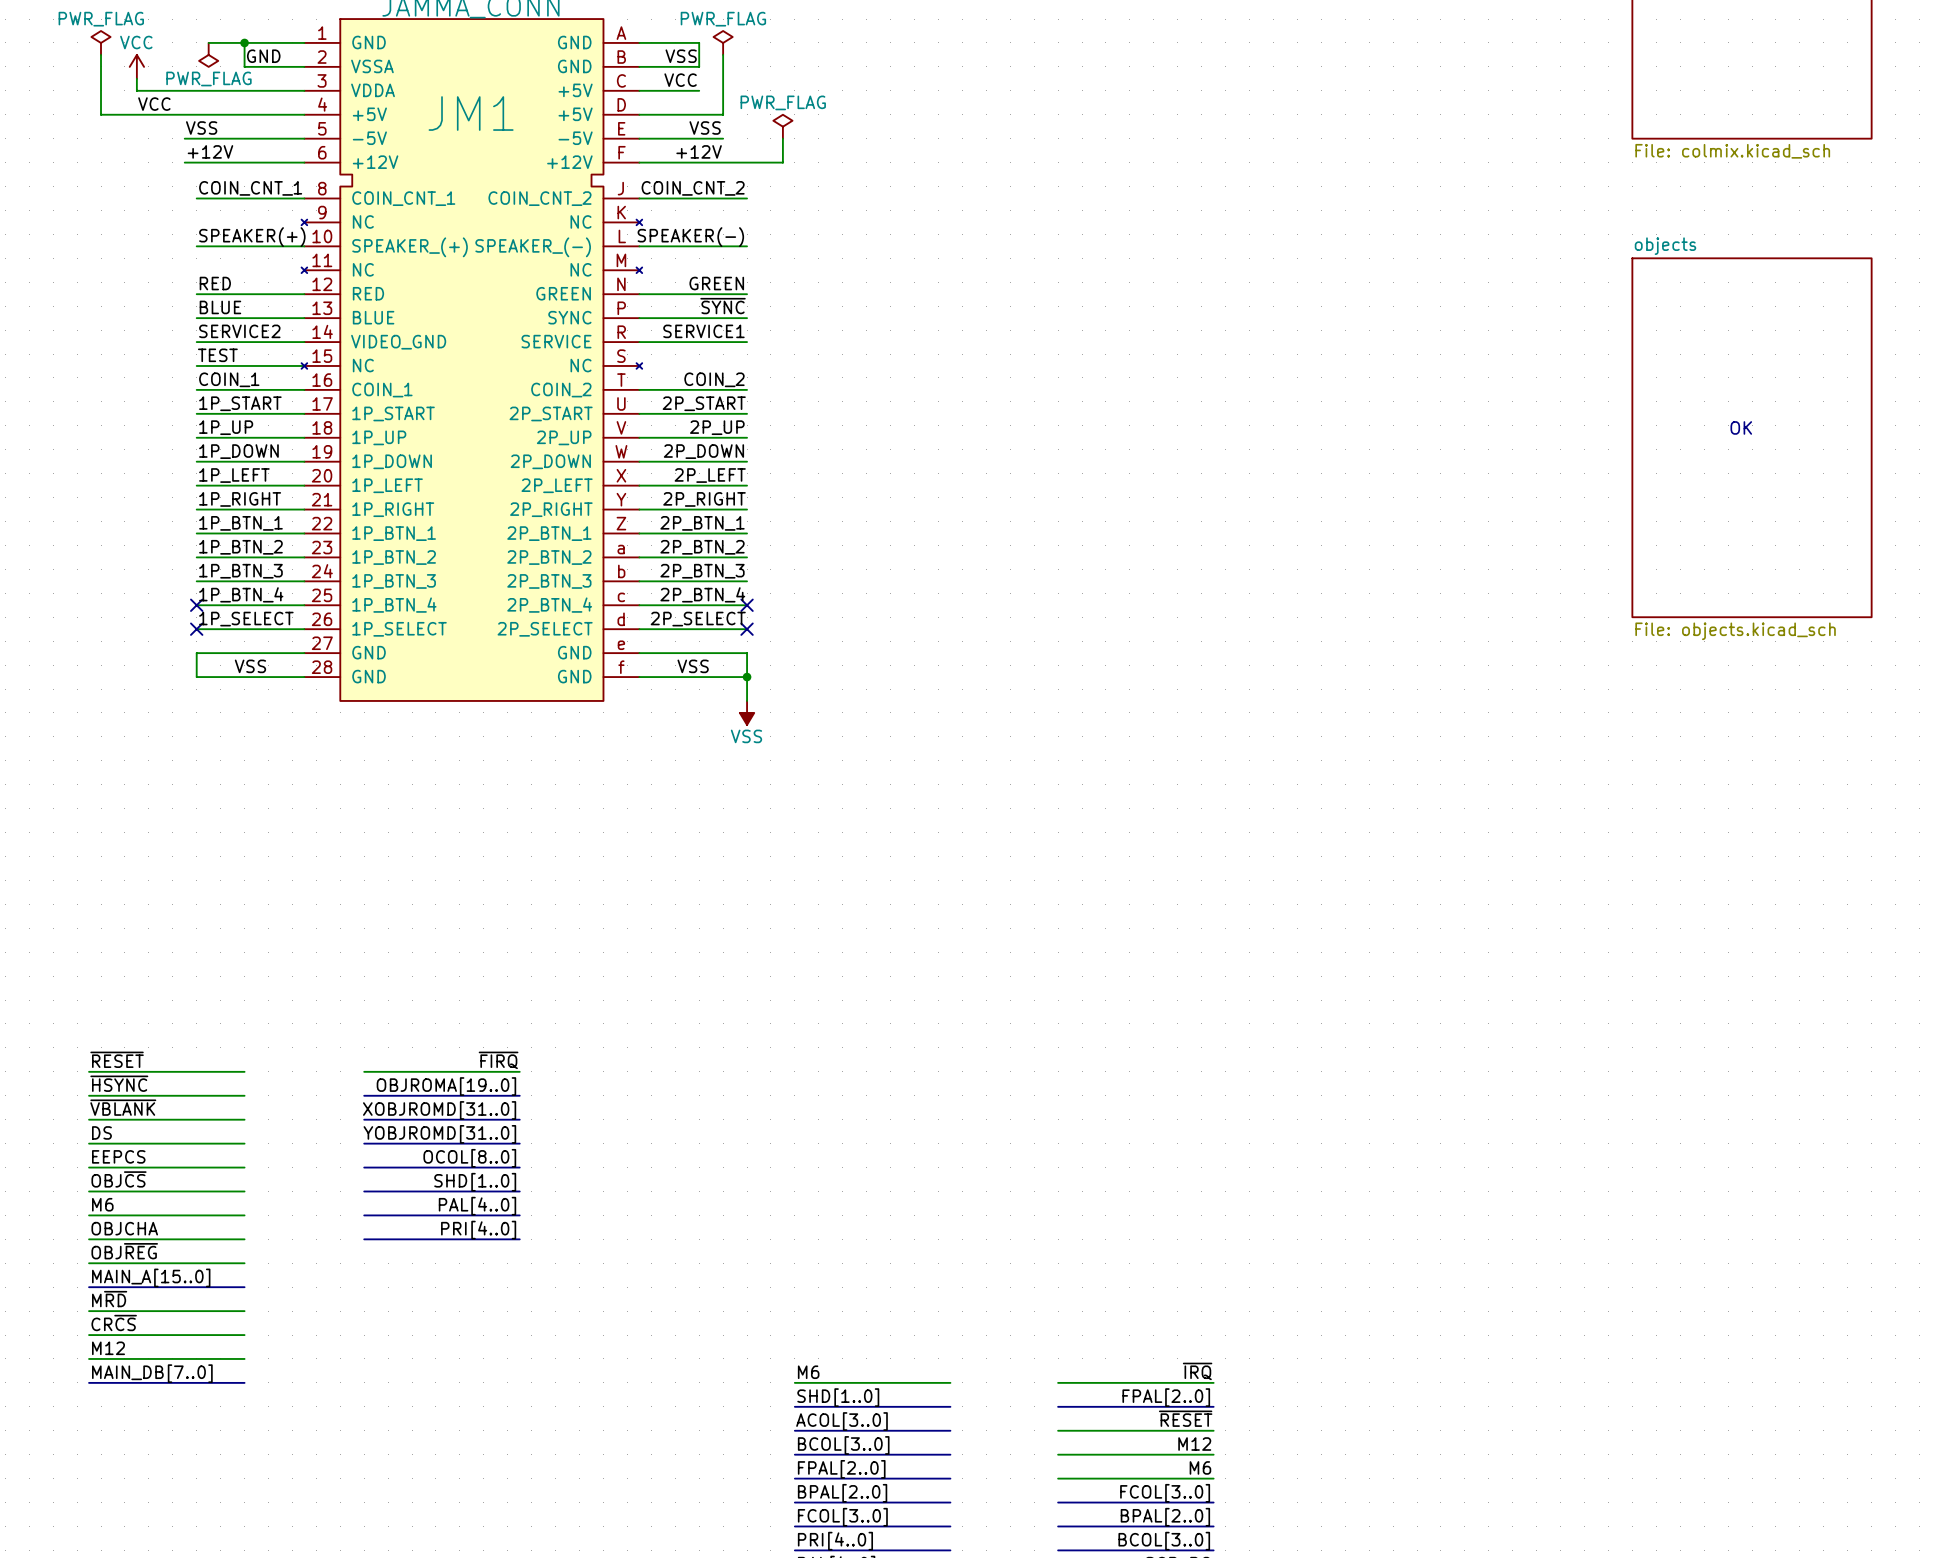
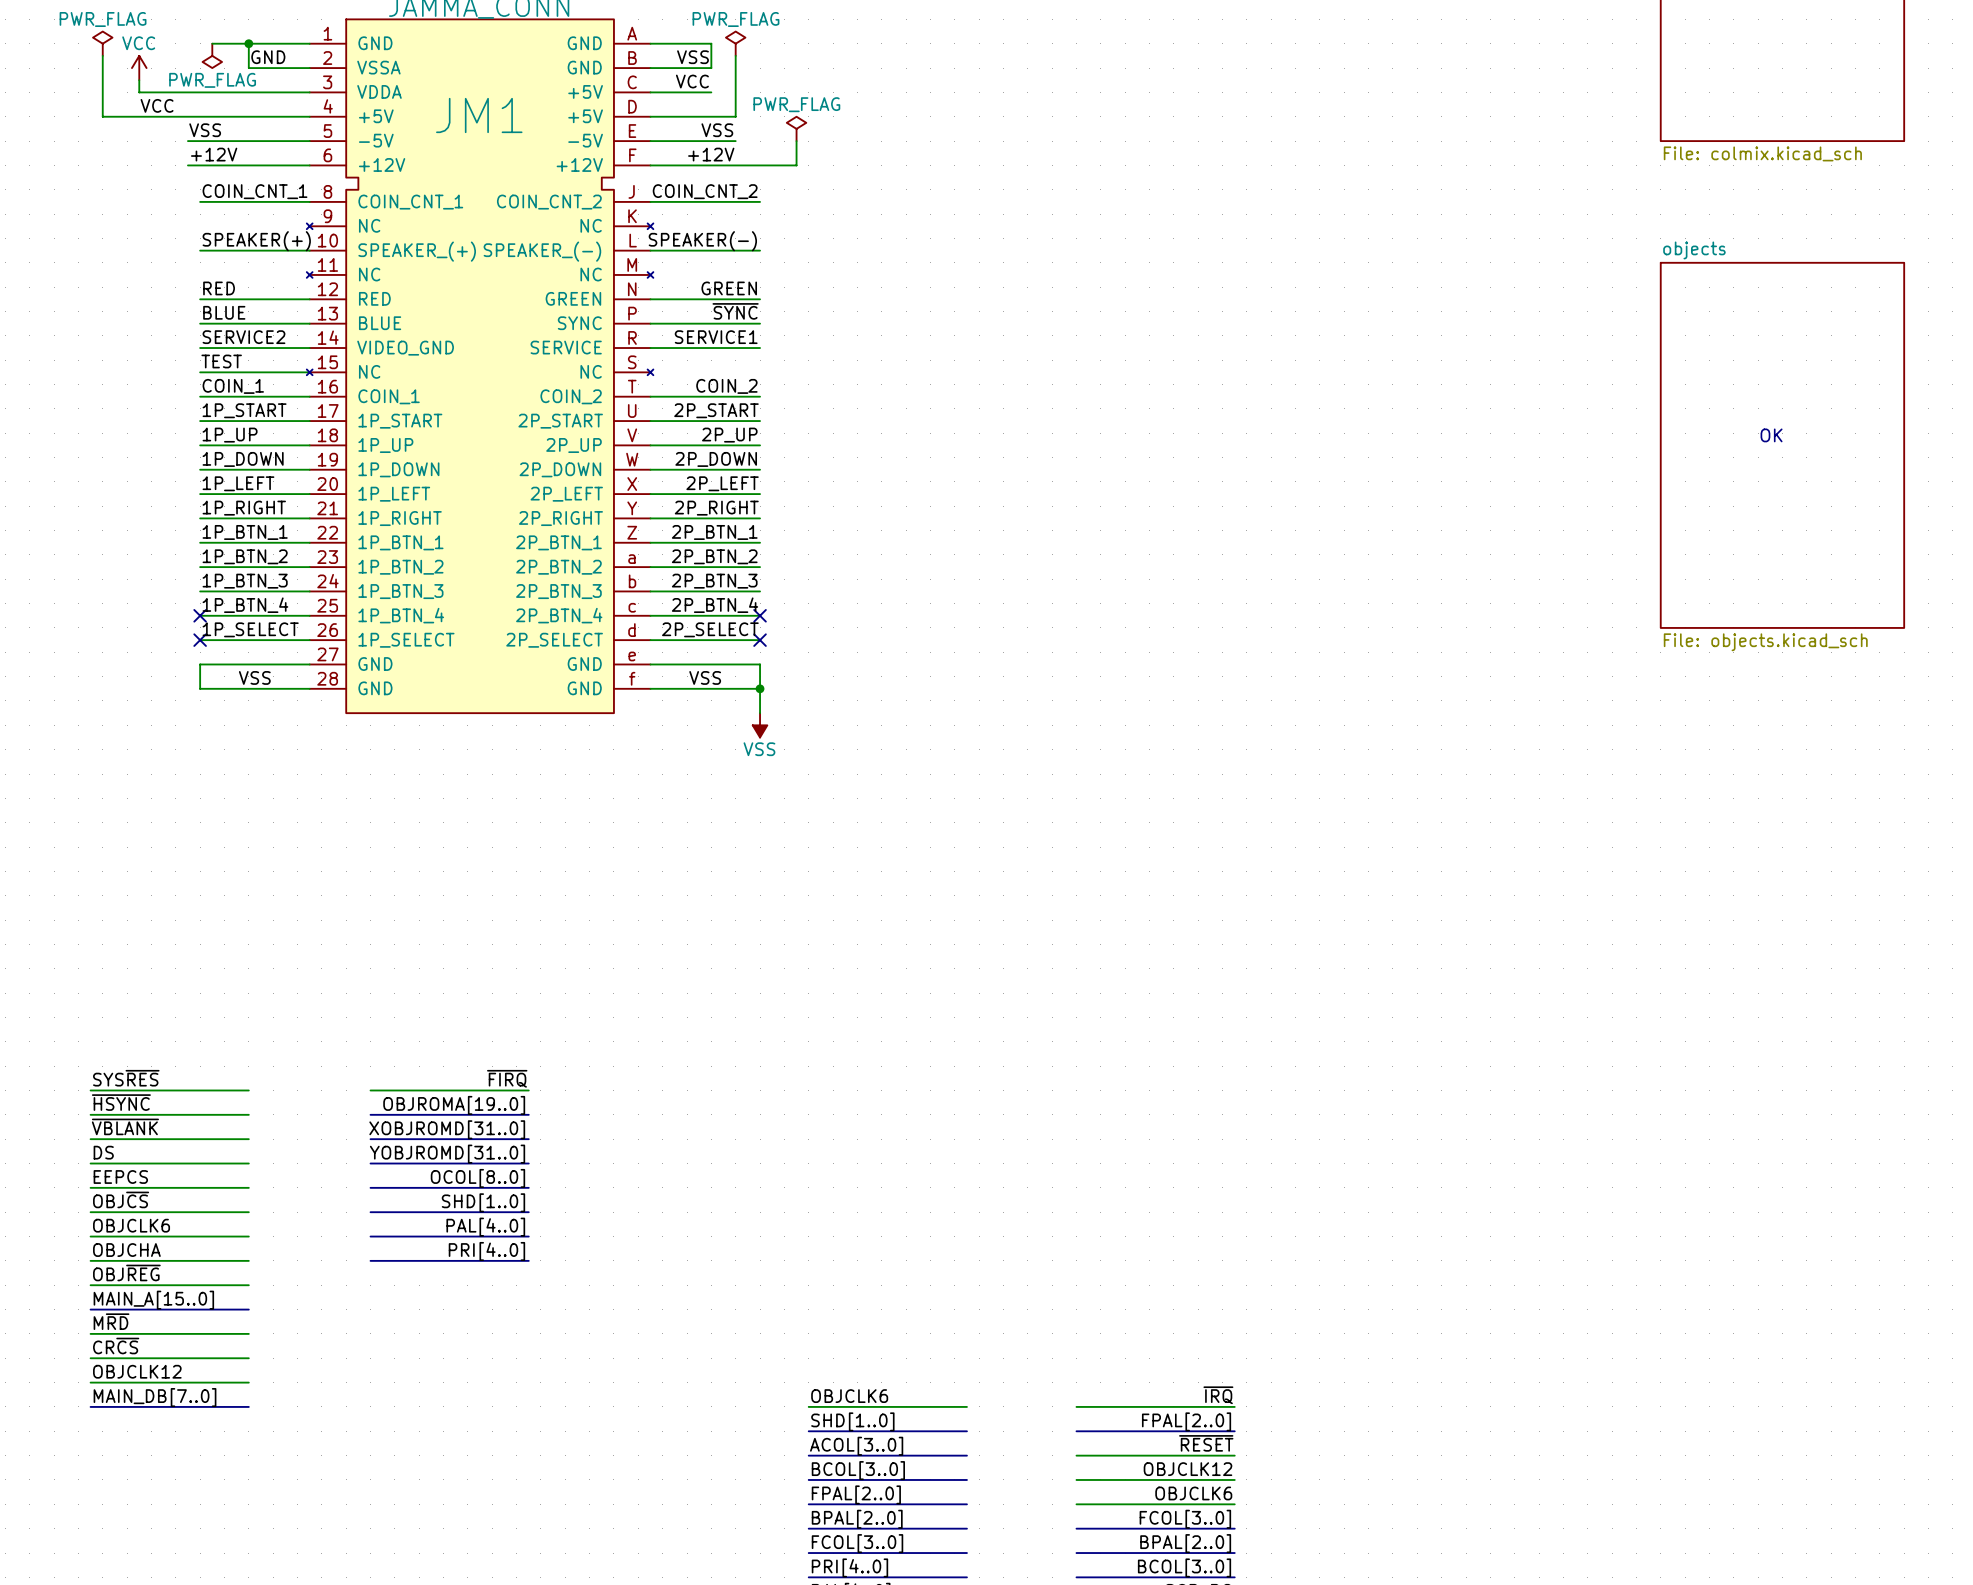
label: ~{RESET} (117, 1059) -> SYS~{RES} (126, 1078)
label: M6 (102, 1204) -> OBJCLK6 (131, 1225)
label: M12 (108, 1348) -> OBJCLK12 (137, 1371)
label: M6 (808, 1372) -> OBJCLK6 (849, 1396)
label: M12 (1194, 1444) -> OBJCLK12 (1187, 1469)
label: M6 (1200, 1467) -> OBJCLK6 (1193, 1493)

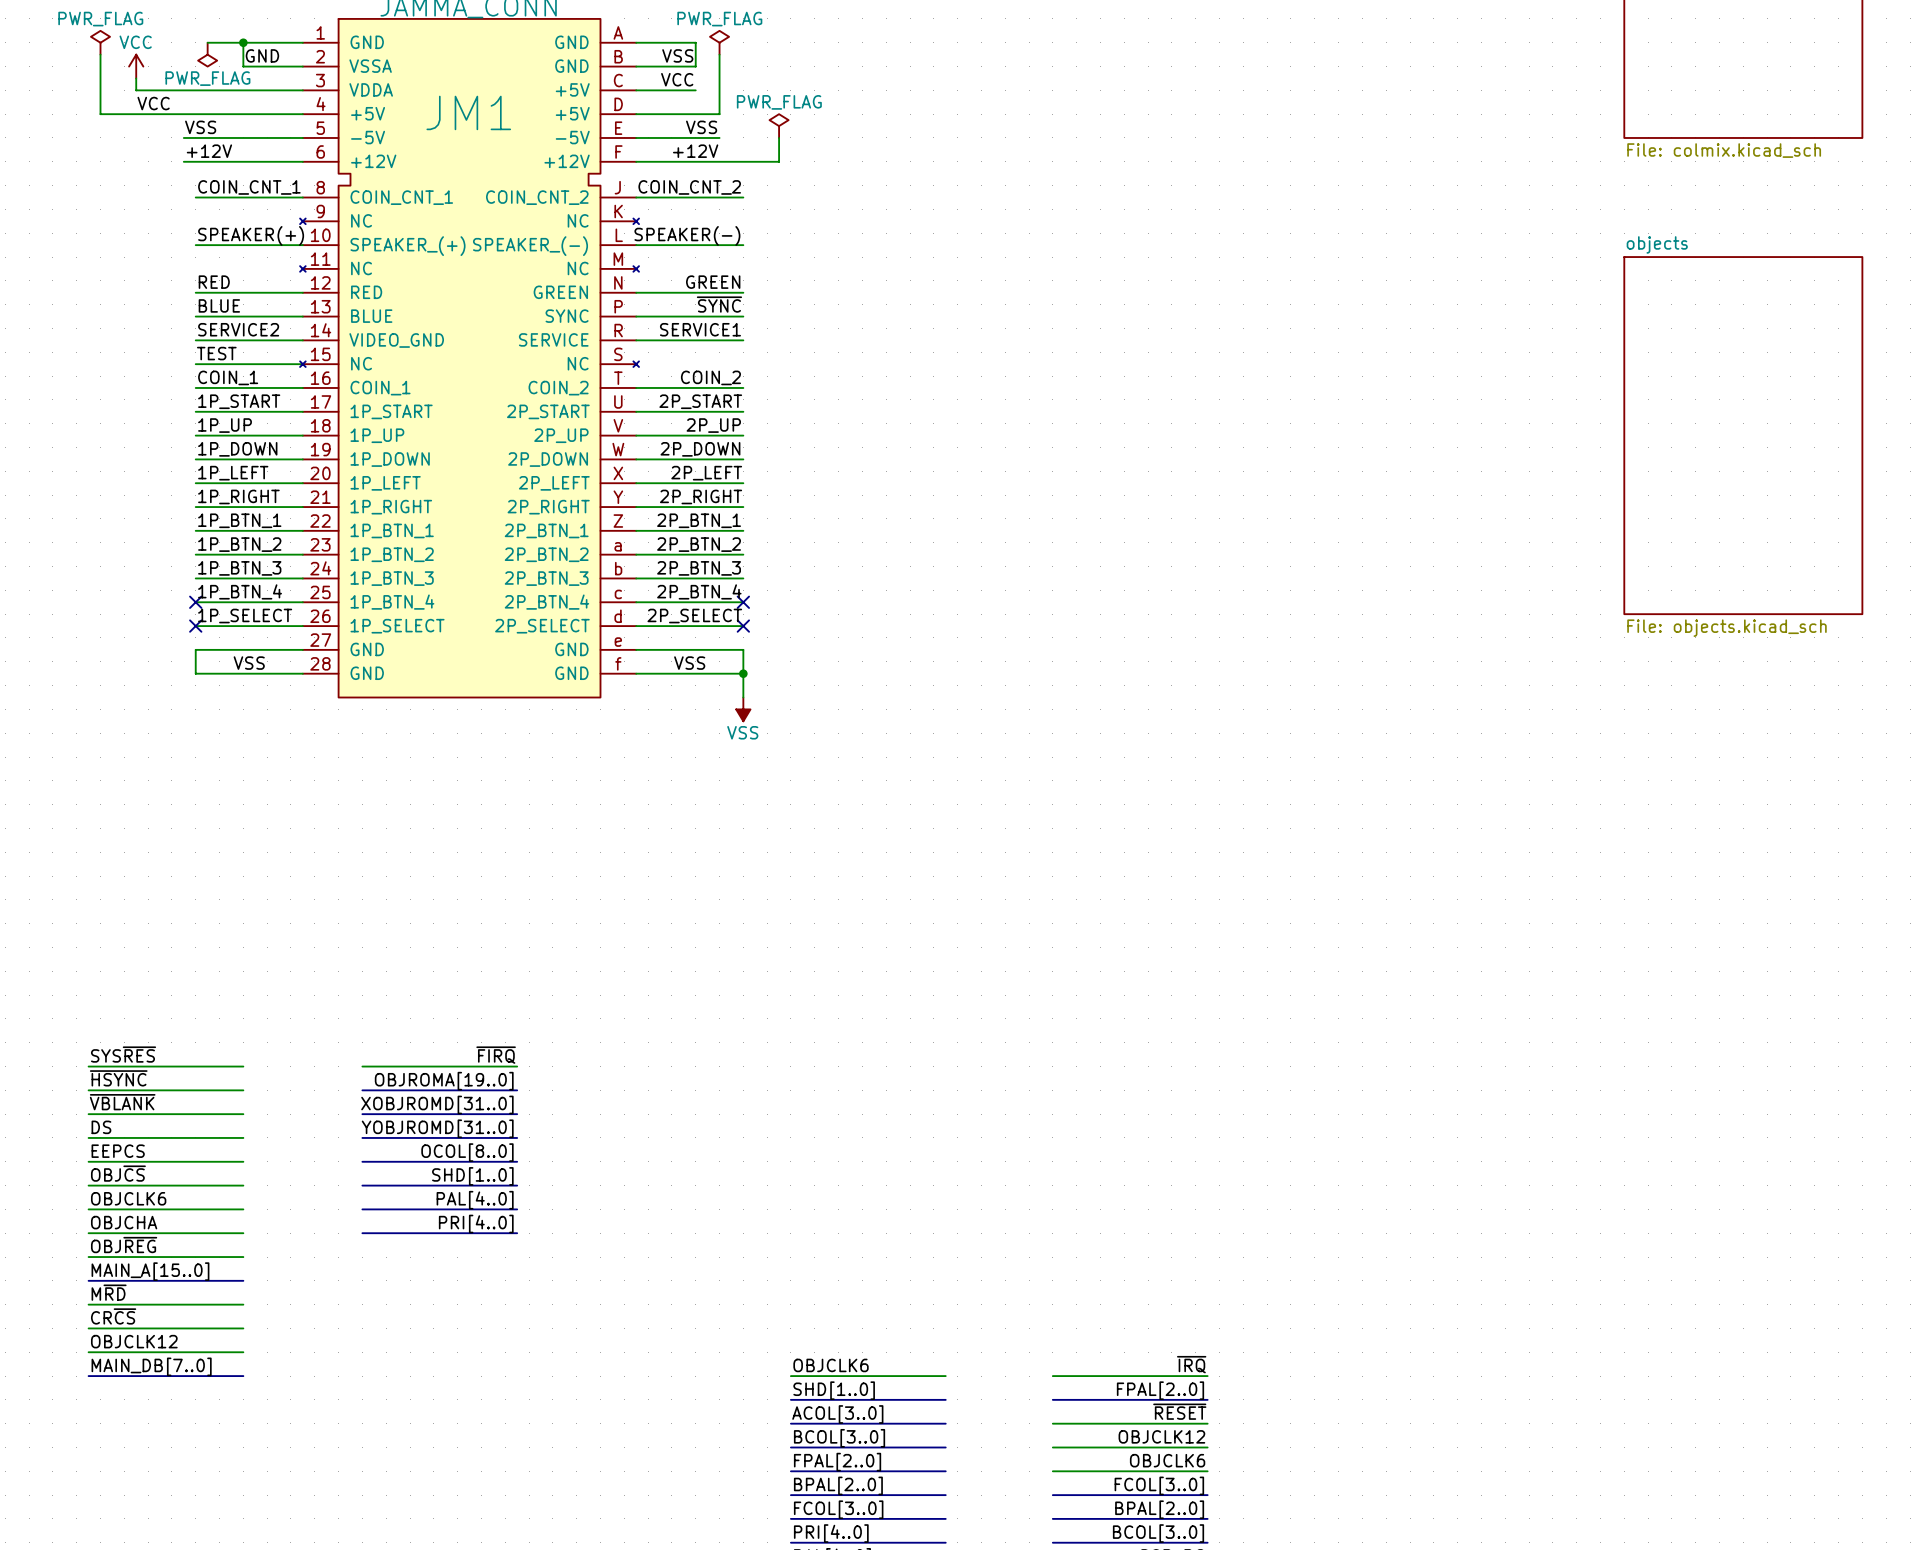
text: OK (1771, 435) -> none

